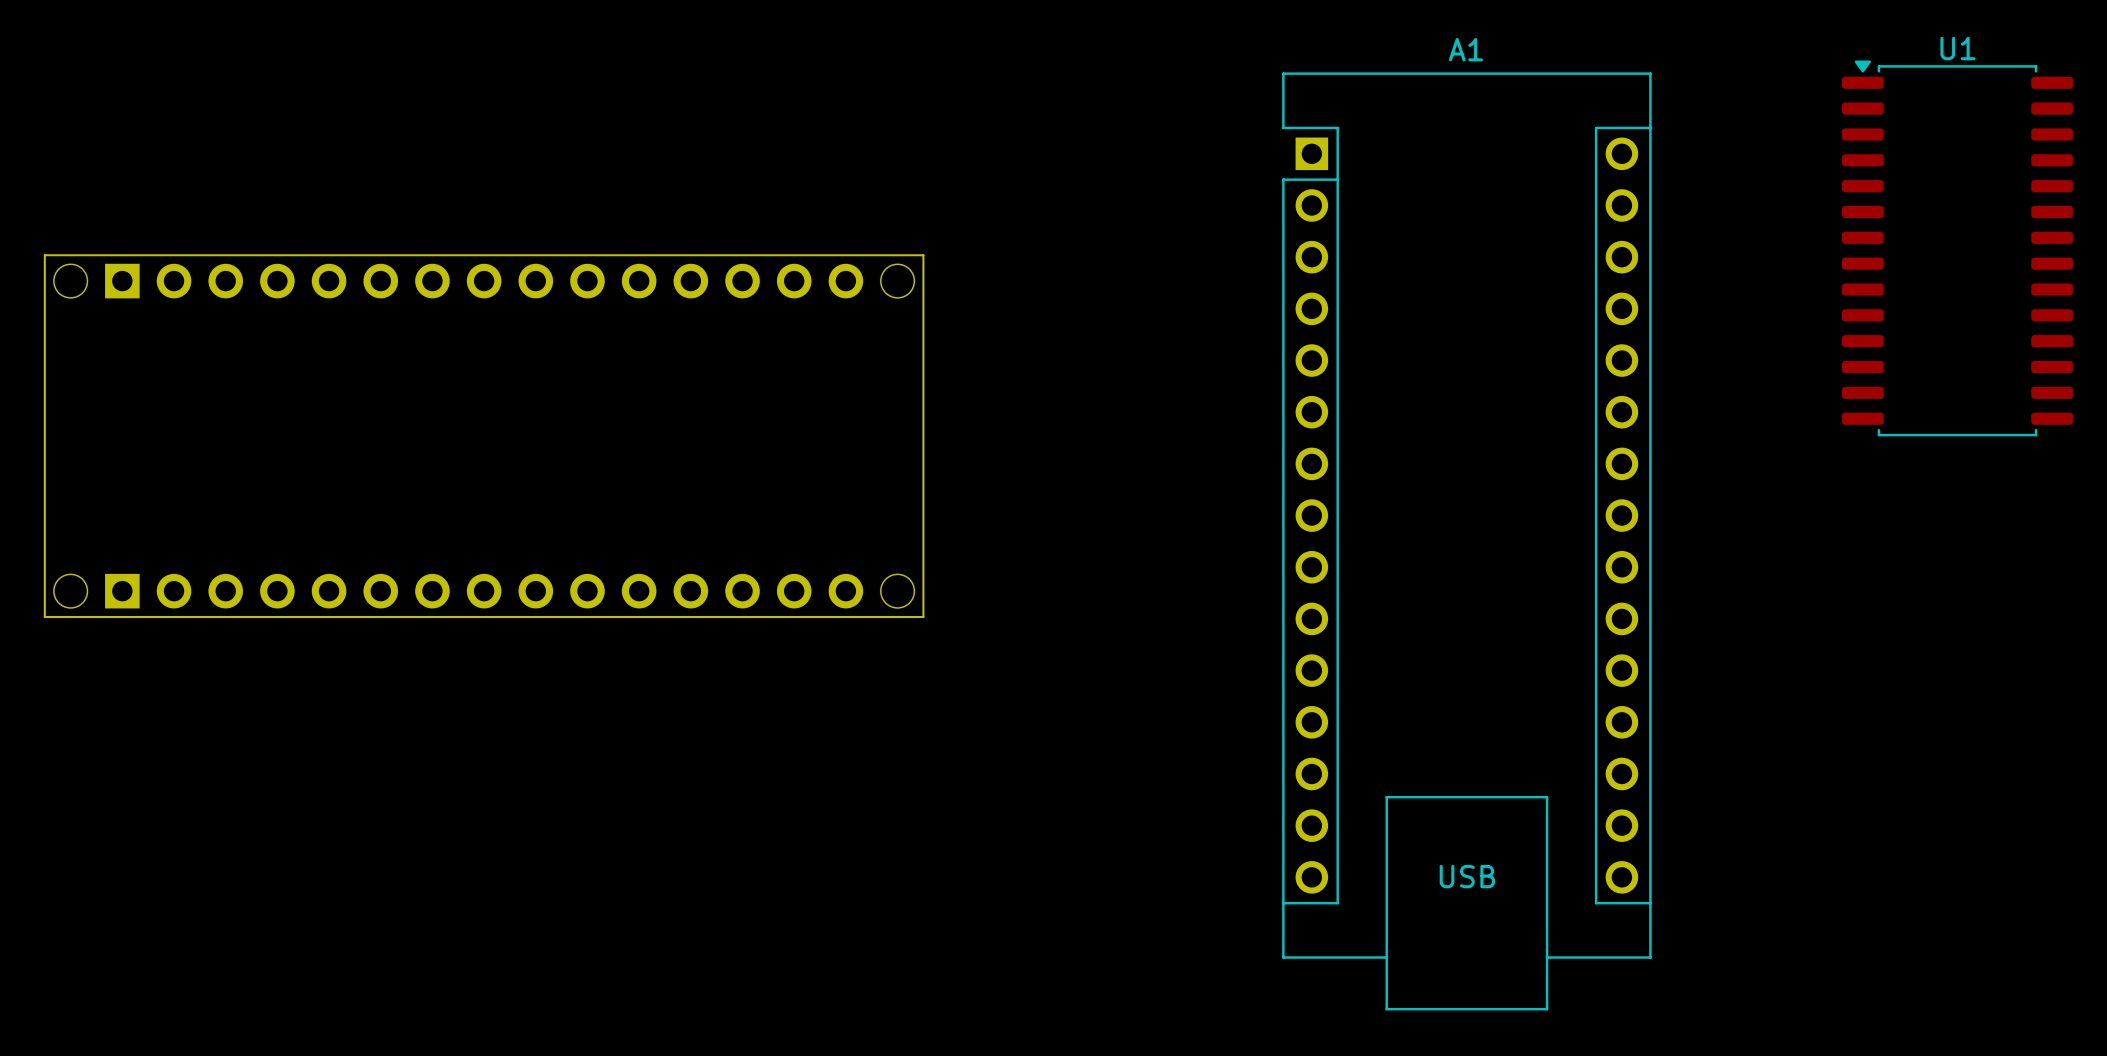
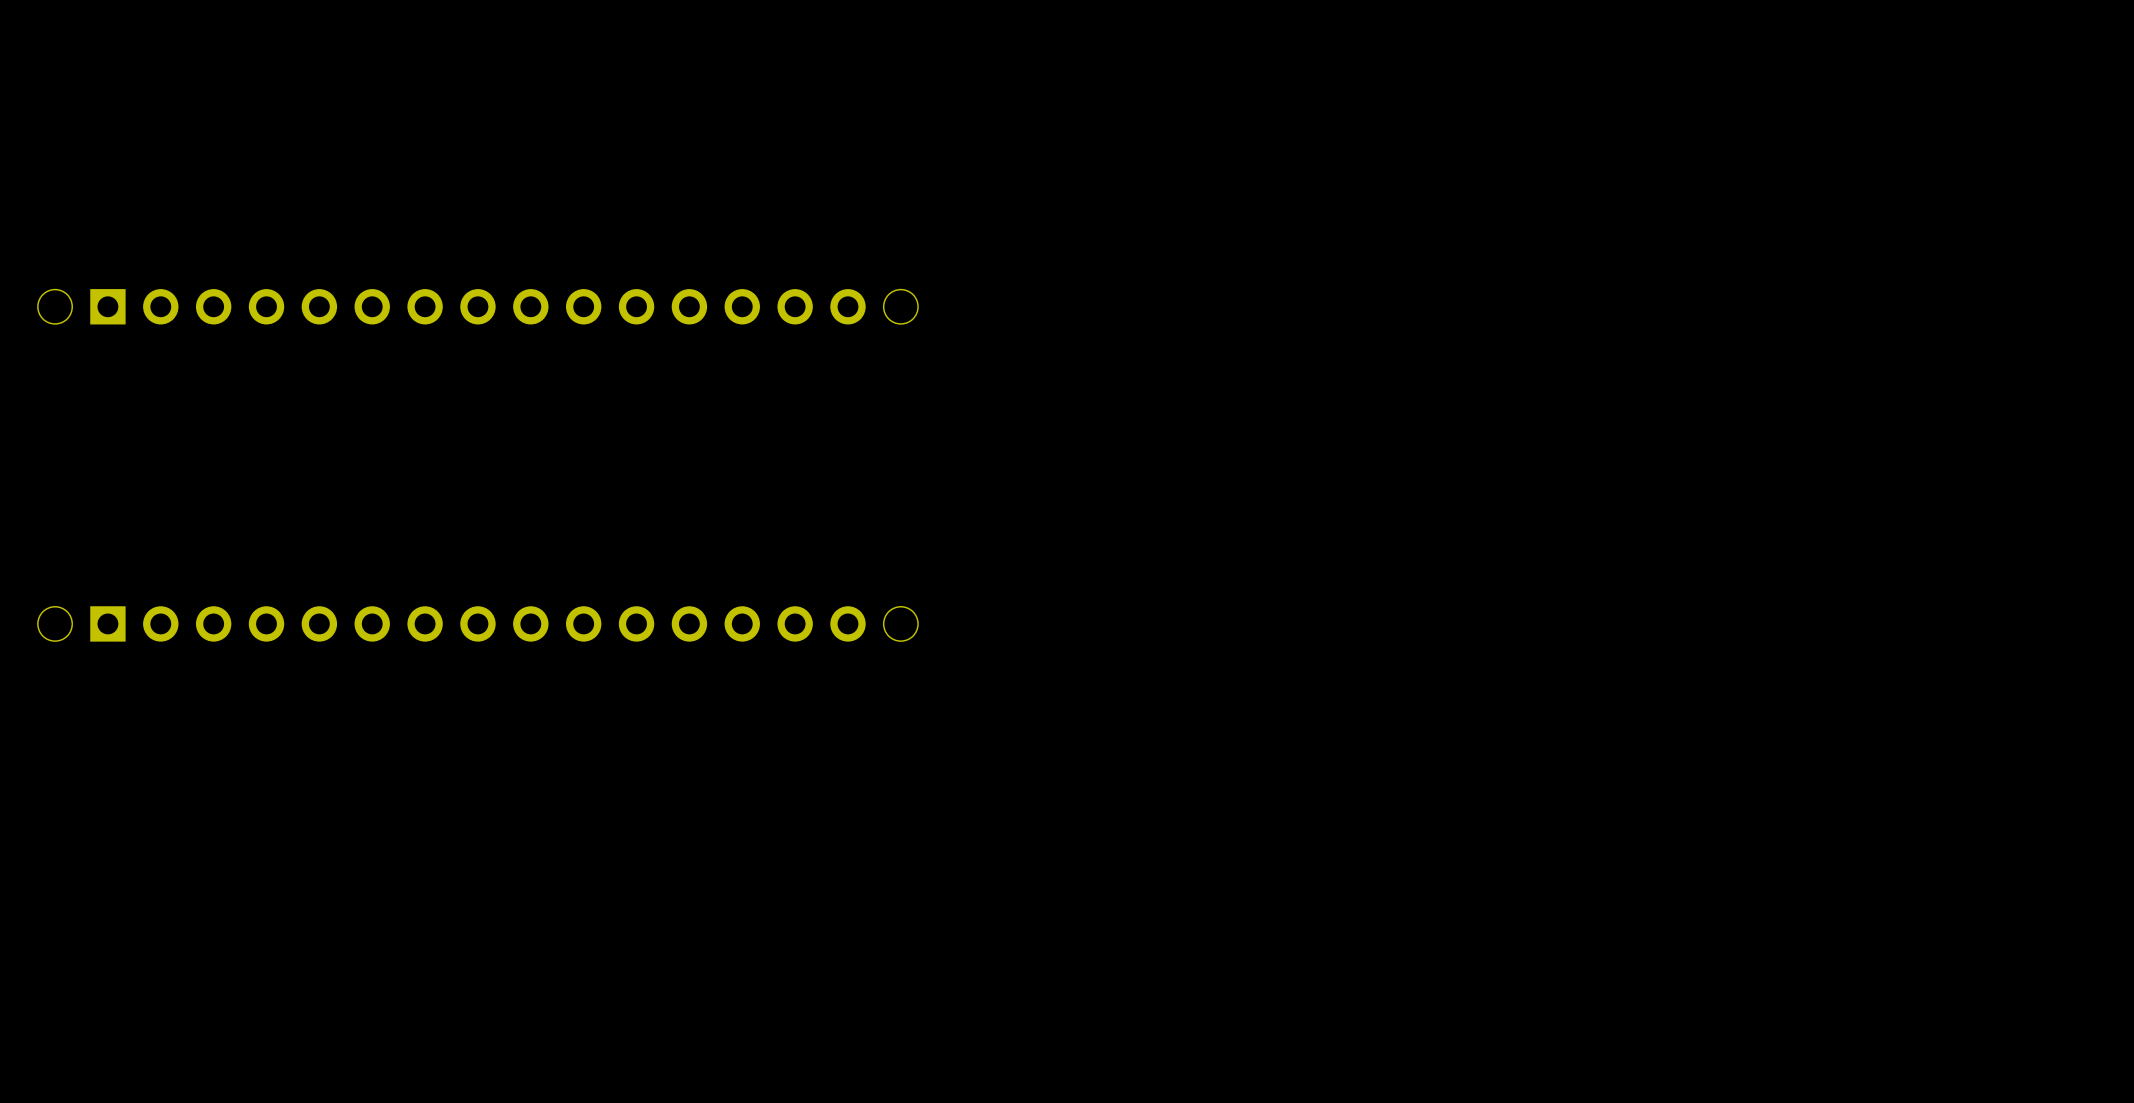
U1: (1957, 248) -> none
board edge: (44, 255) (923, 255) (923, 617) (44, 617) (44, 255) -> none
A1: (1466, 541) -> none

